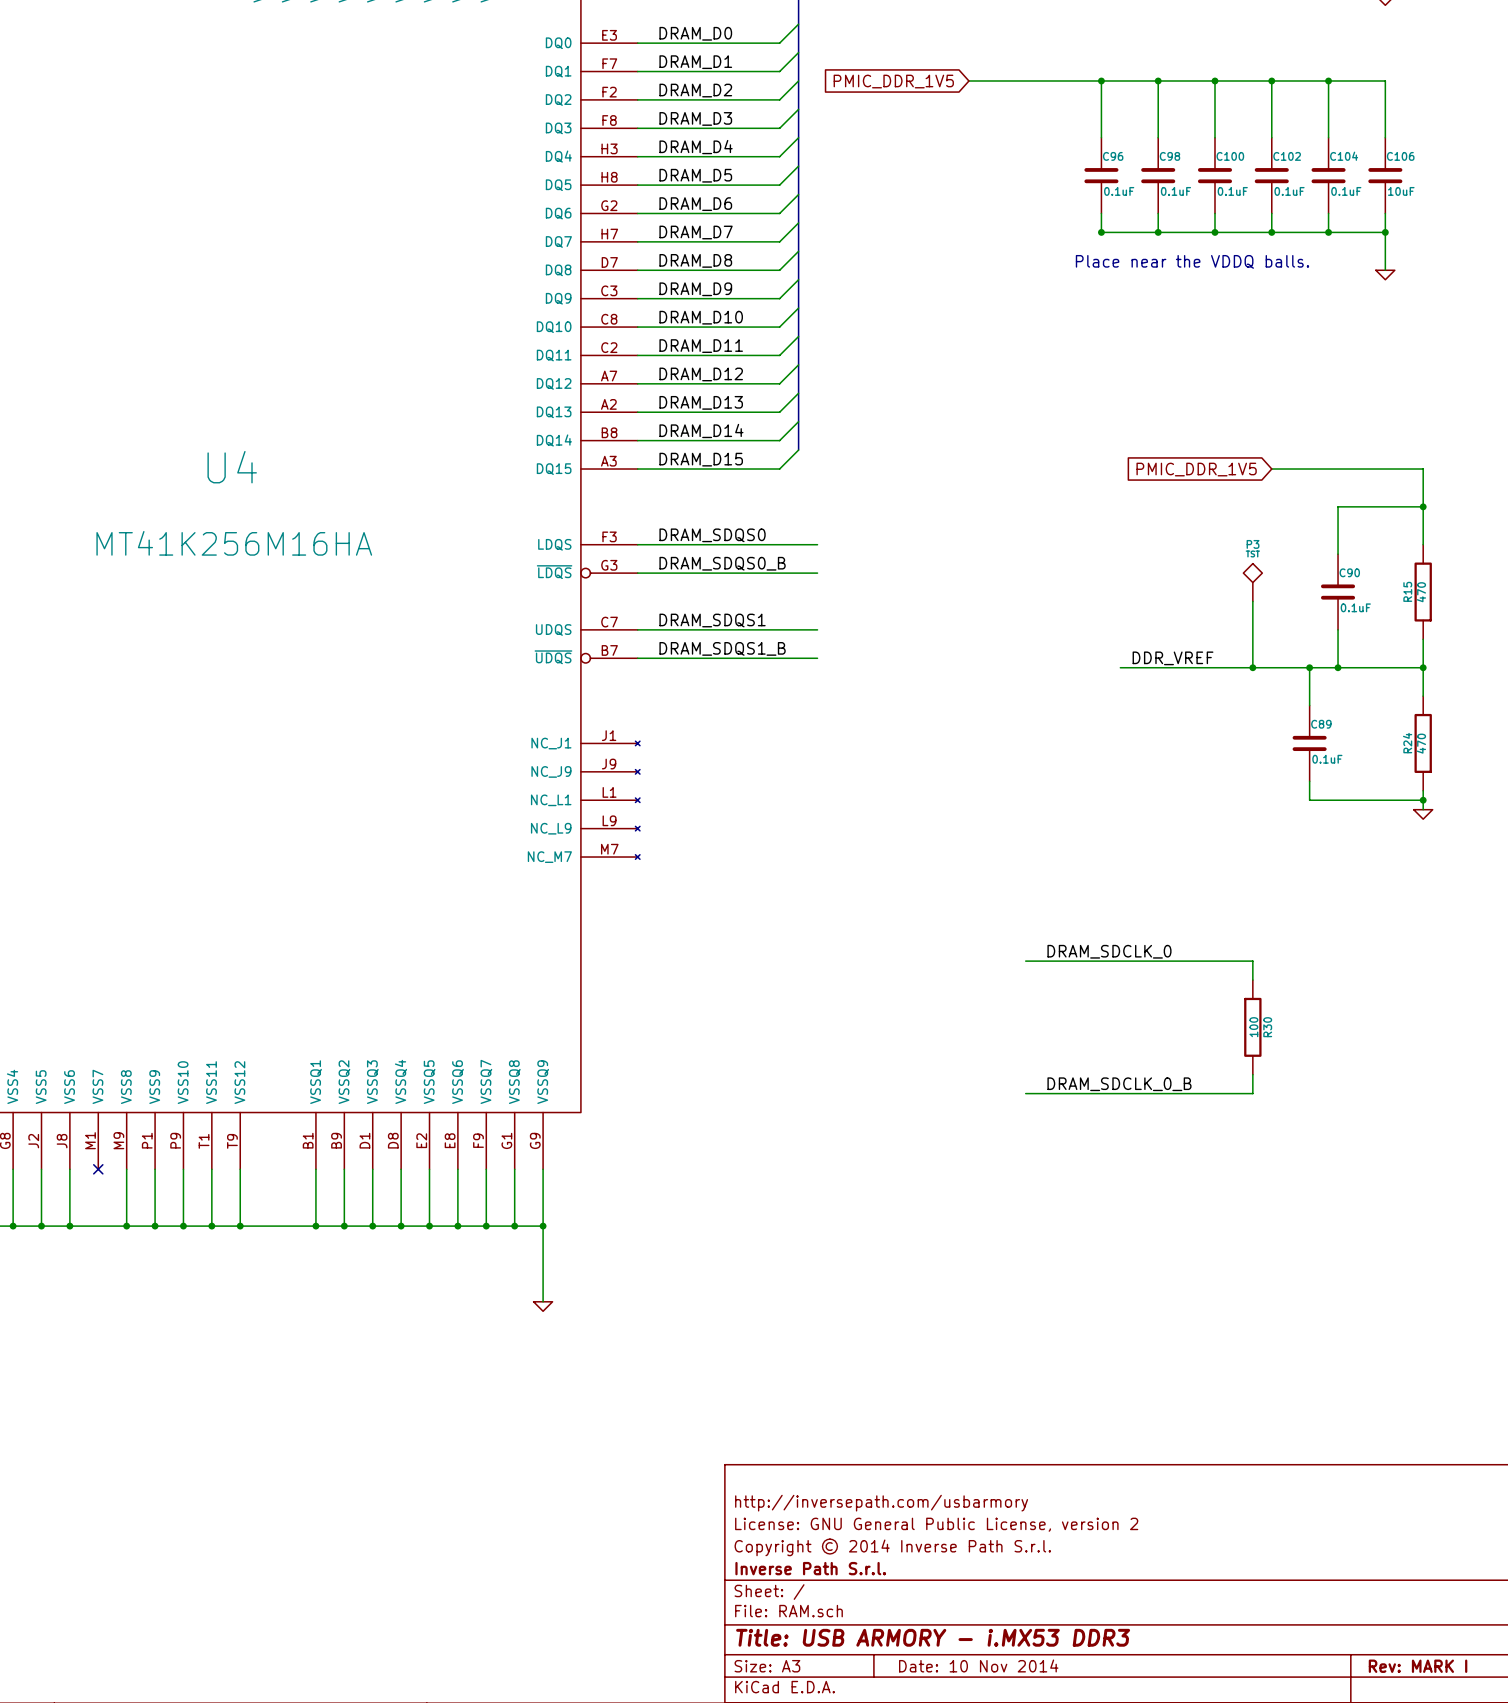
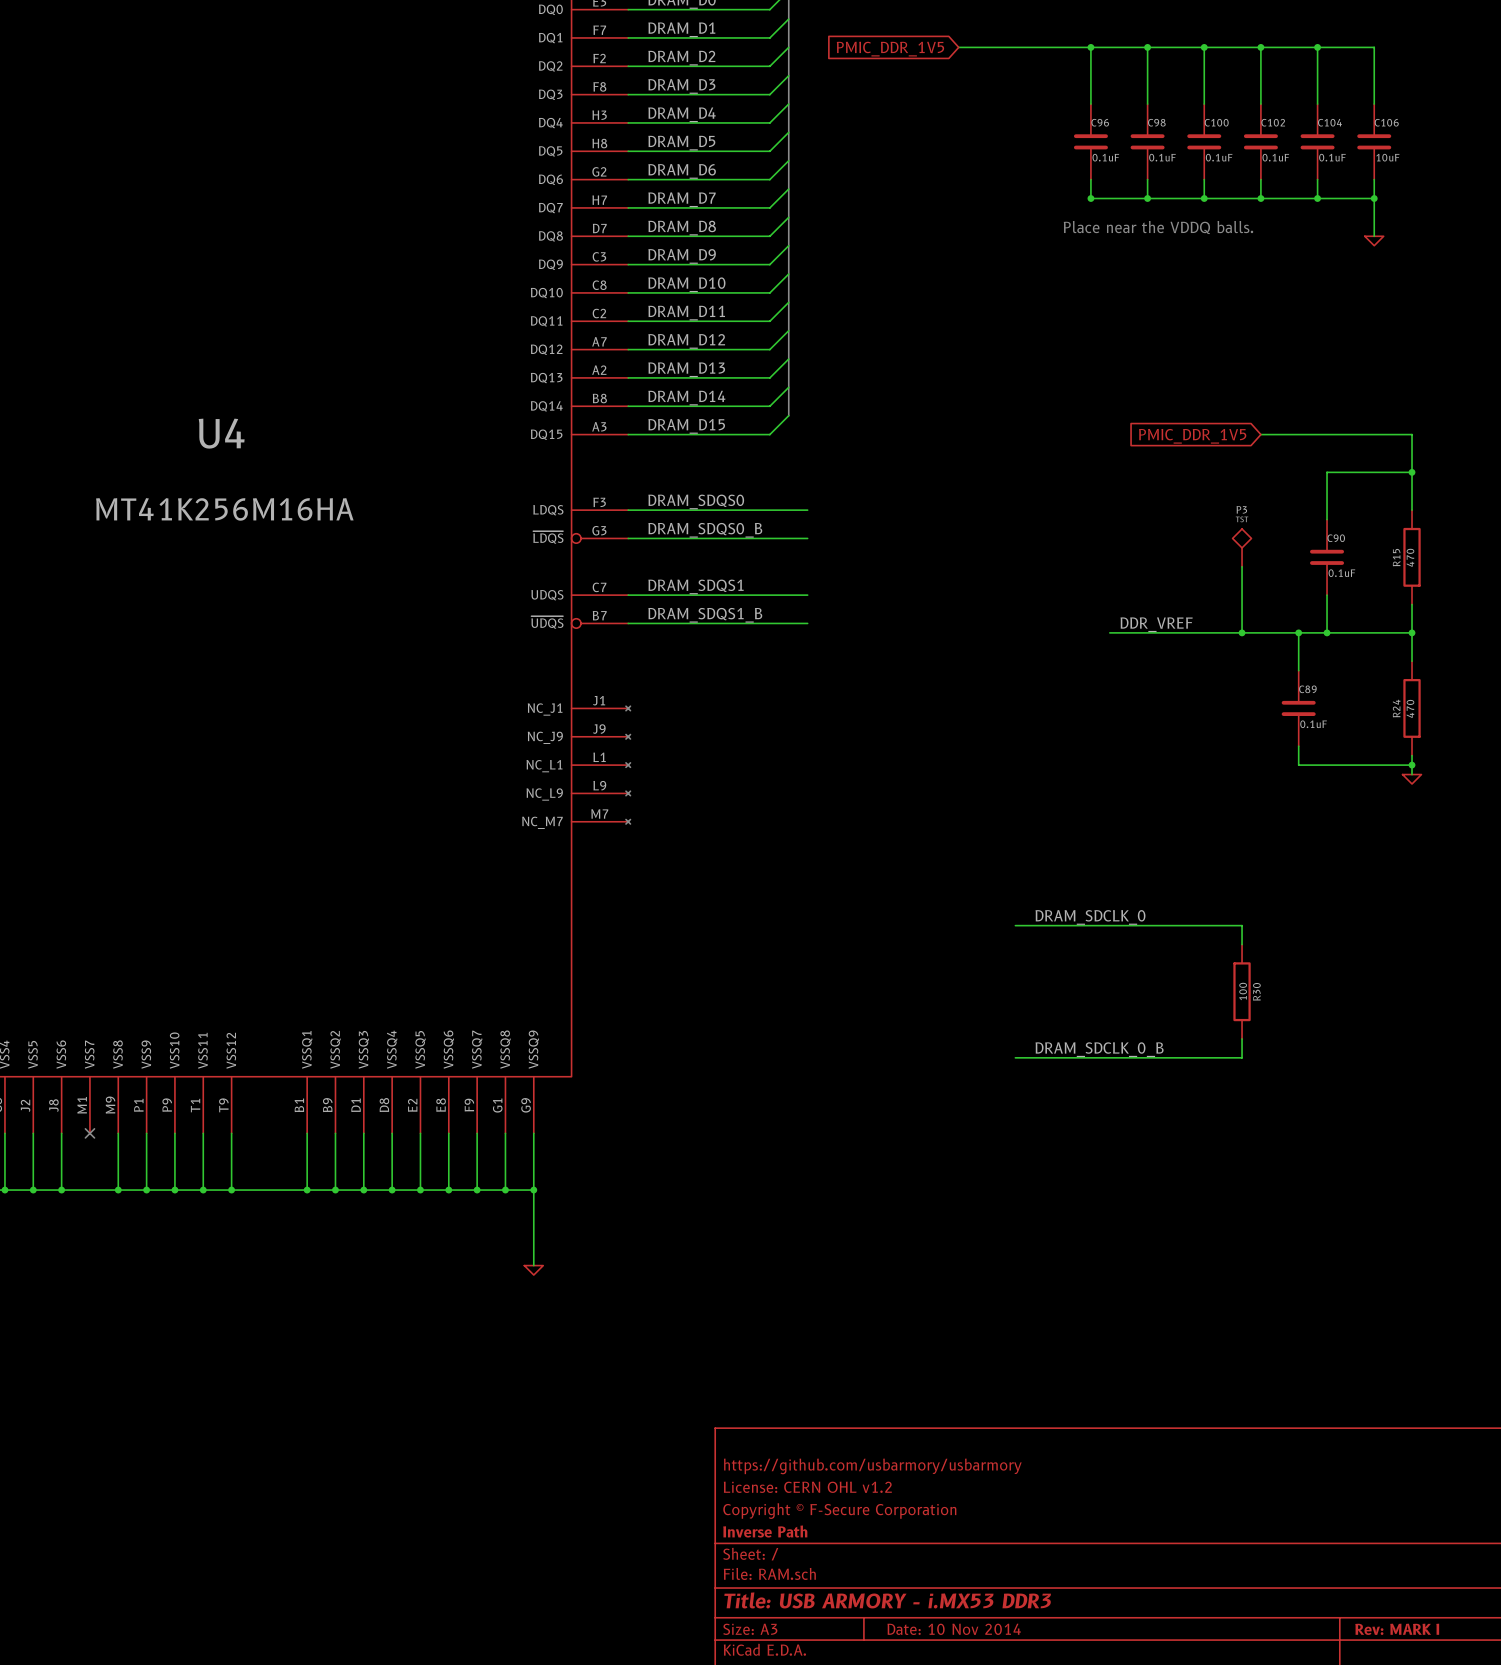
title block: http://inversepath.com/usbarmory (881, 1503) -> https://github.com/usbarmory/usbarmory (872, 1466)
title block: License: GNU General Public License, version 2 (936, 1524) -> License: CERN OHL v1.2 (807, 1487)
title block: Copyright © 2014 Inverse Path S.r.l. (892, 1547) -> Copyright © F-Secure Corporation (839, 1511)
title block: Inverse Path S.r.l. (810, 1568) -> Inverse Path (765, 1531)

